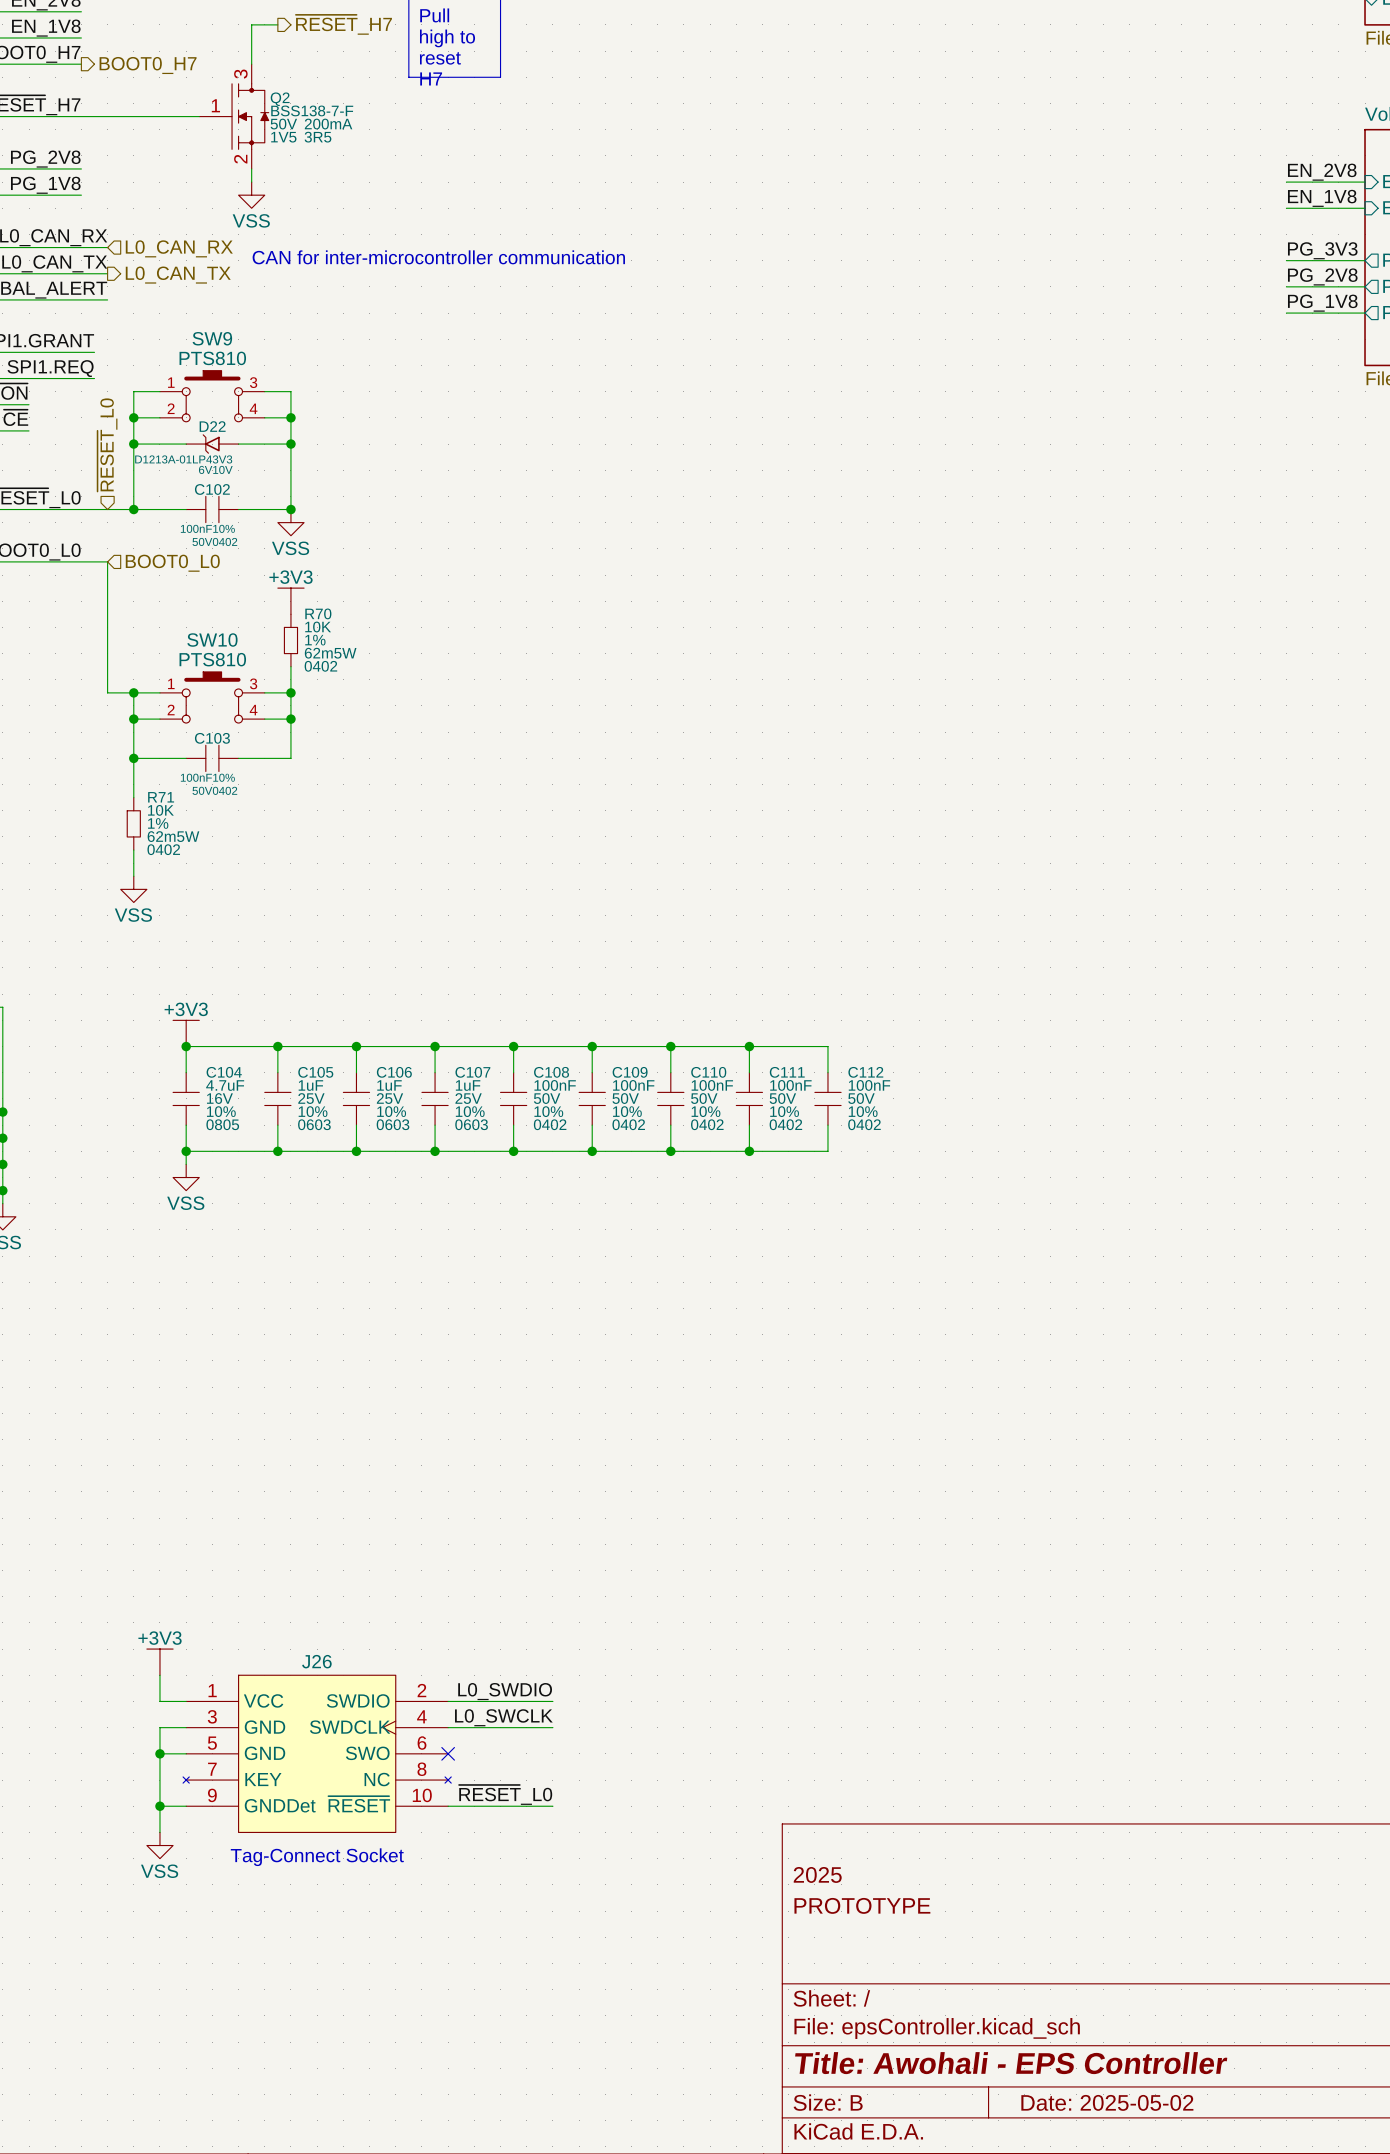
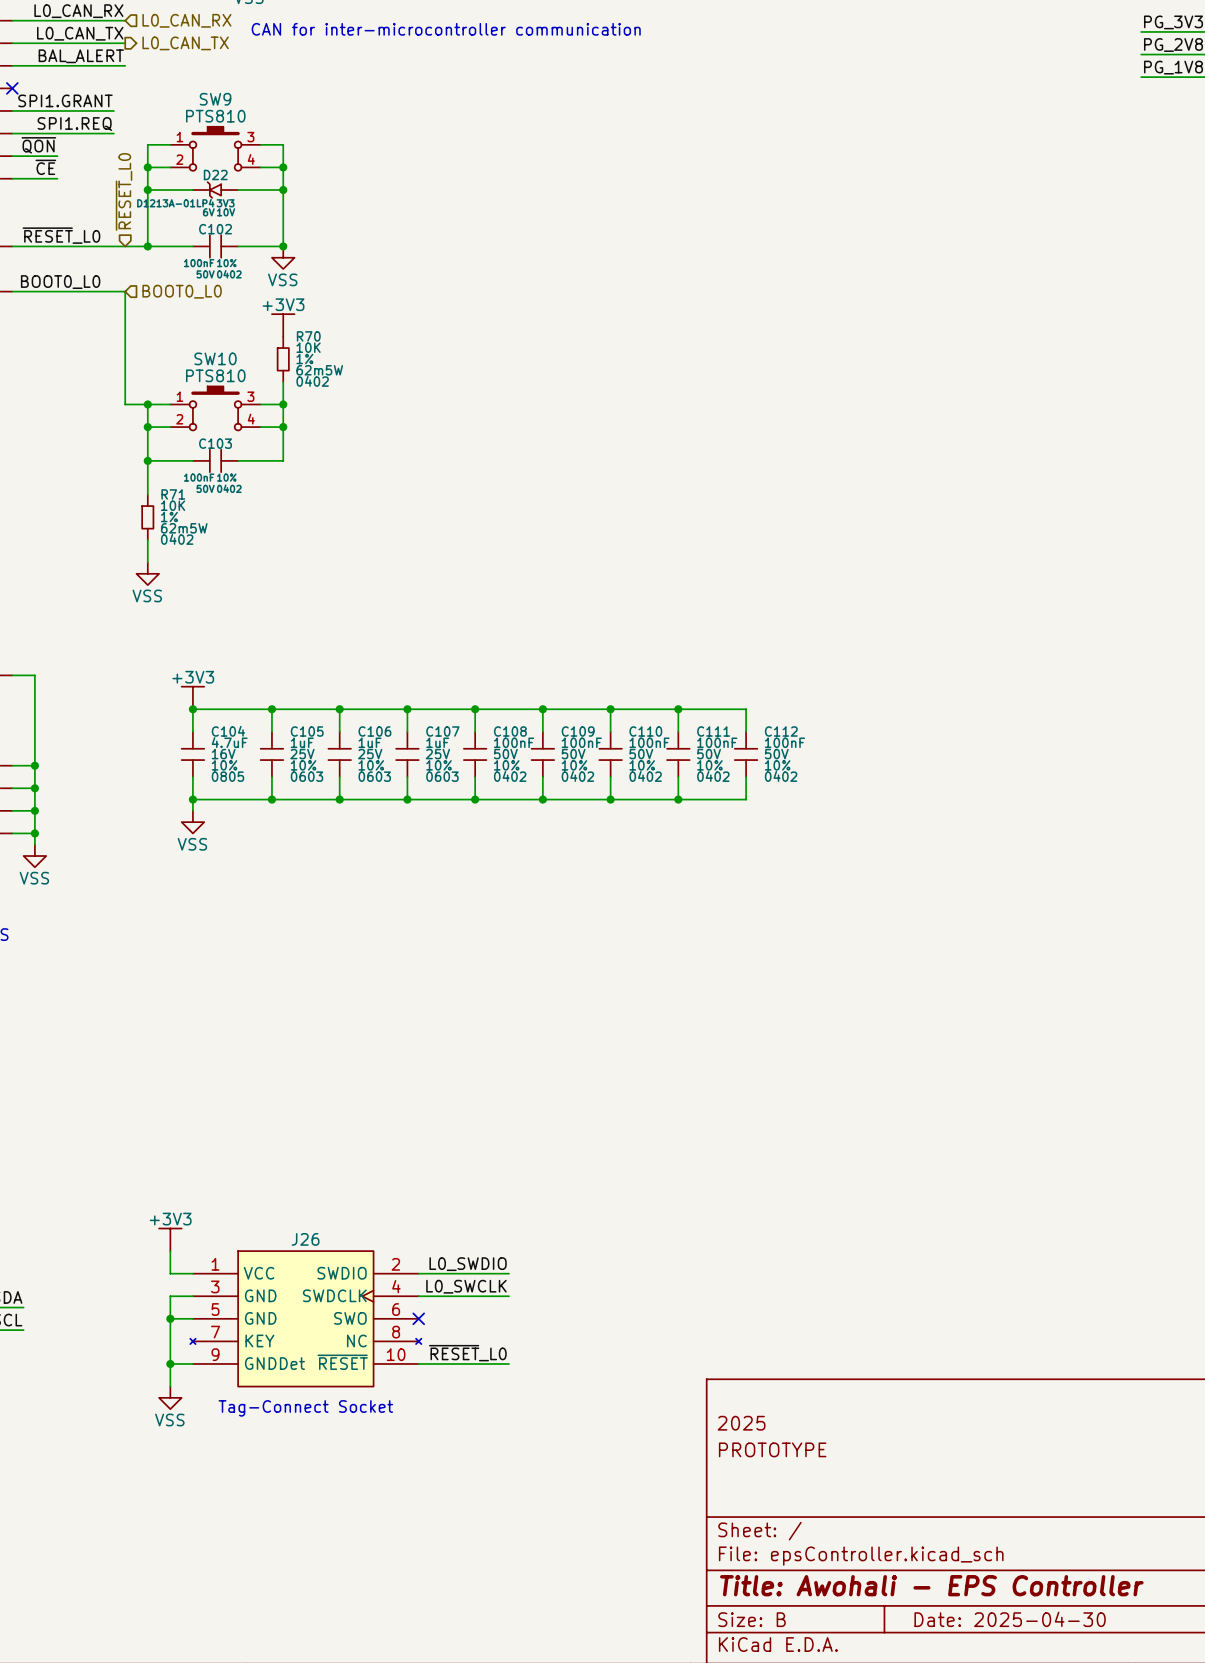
title block: Date: 2025-05-02 (1107, 2102) -> Date: 2025-04-30 (1010, 1619)

